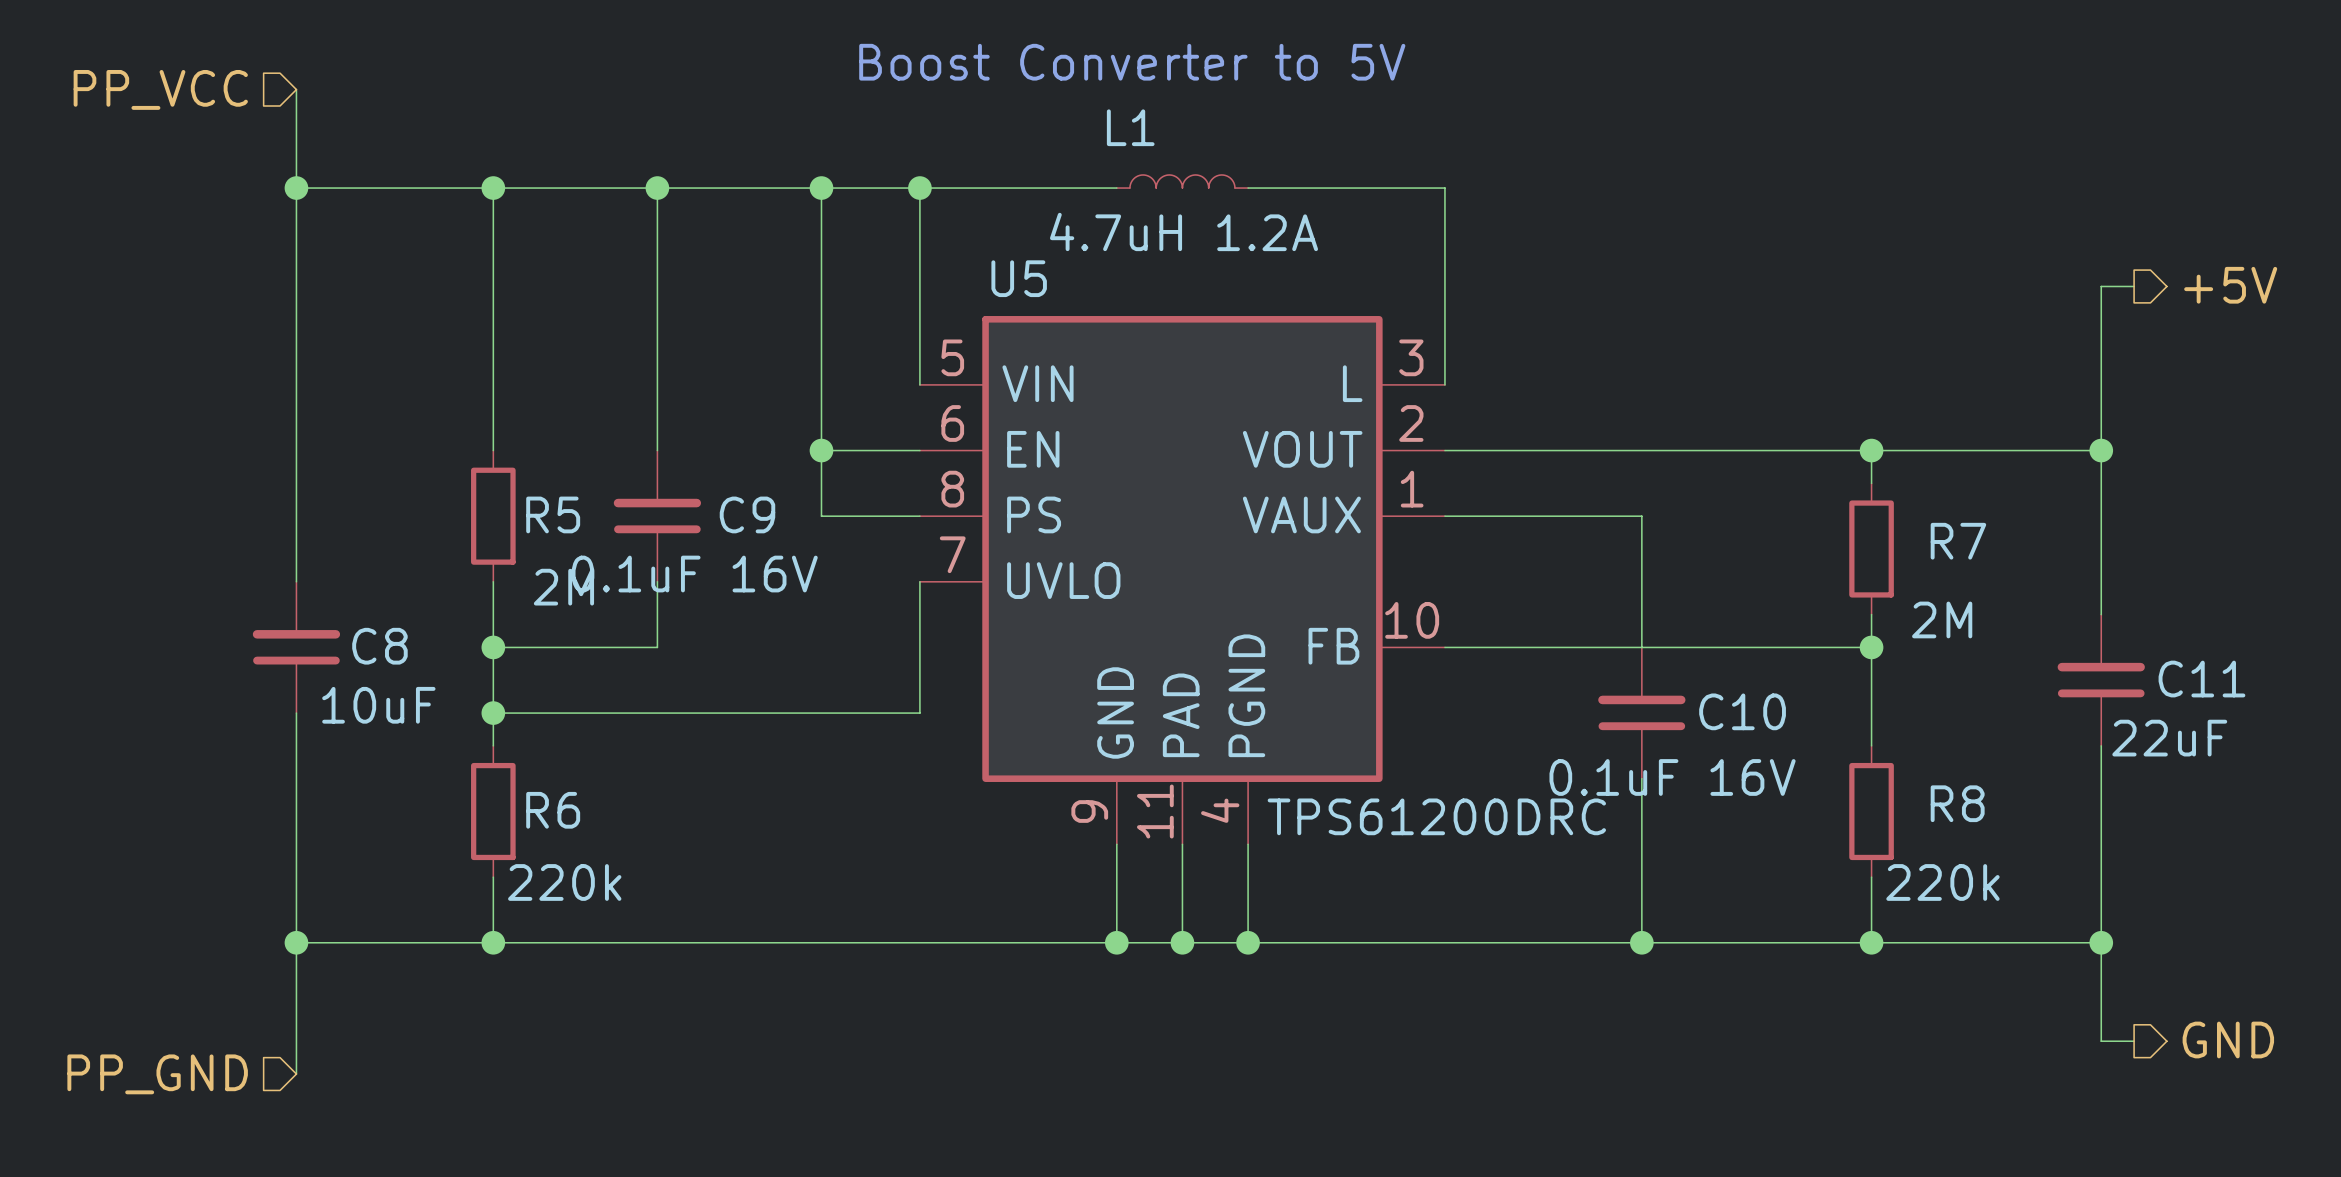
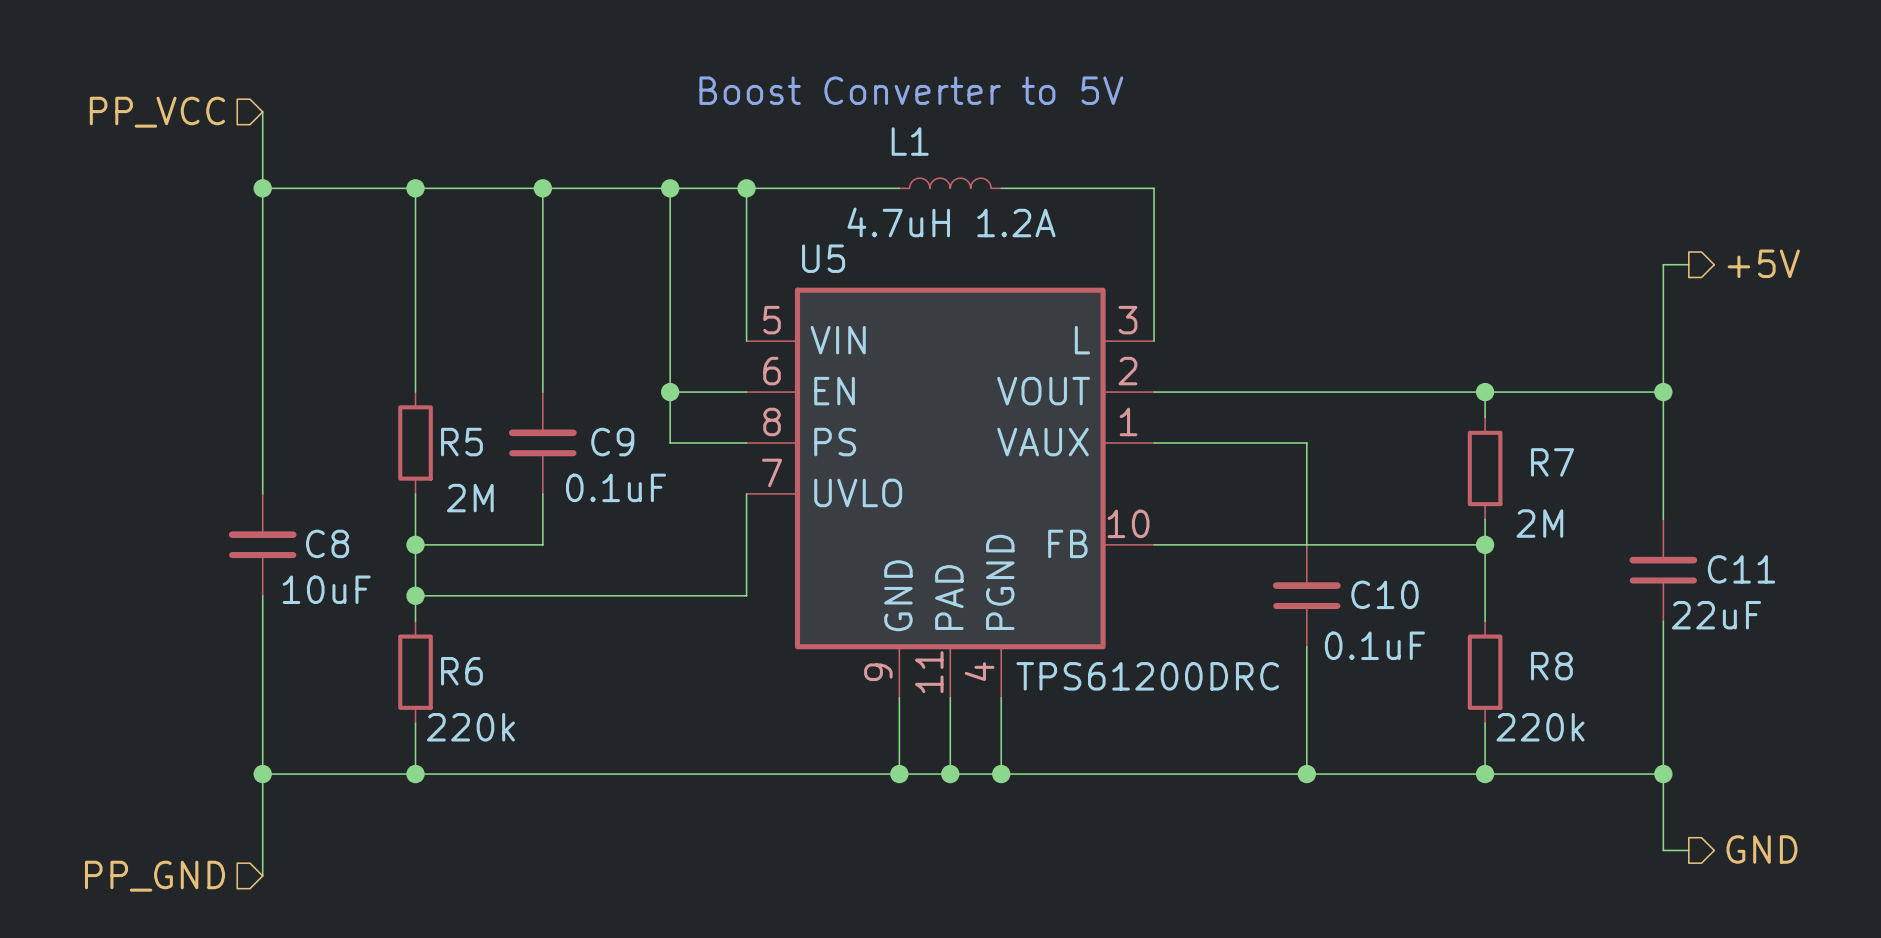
C9 value: 0.1uF 16V (694, 574) -> 0.1uF (616, 487)
C10 value: 0.1uF 16V (1672, 777) -> 0.1uF (1374, 645)

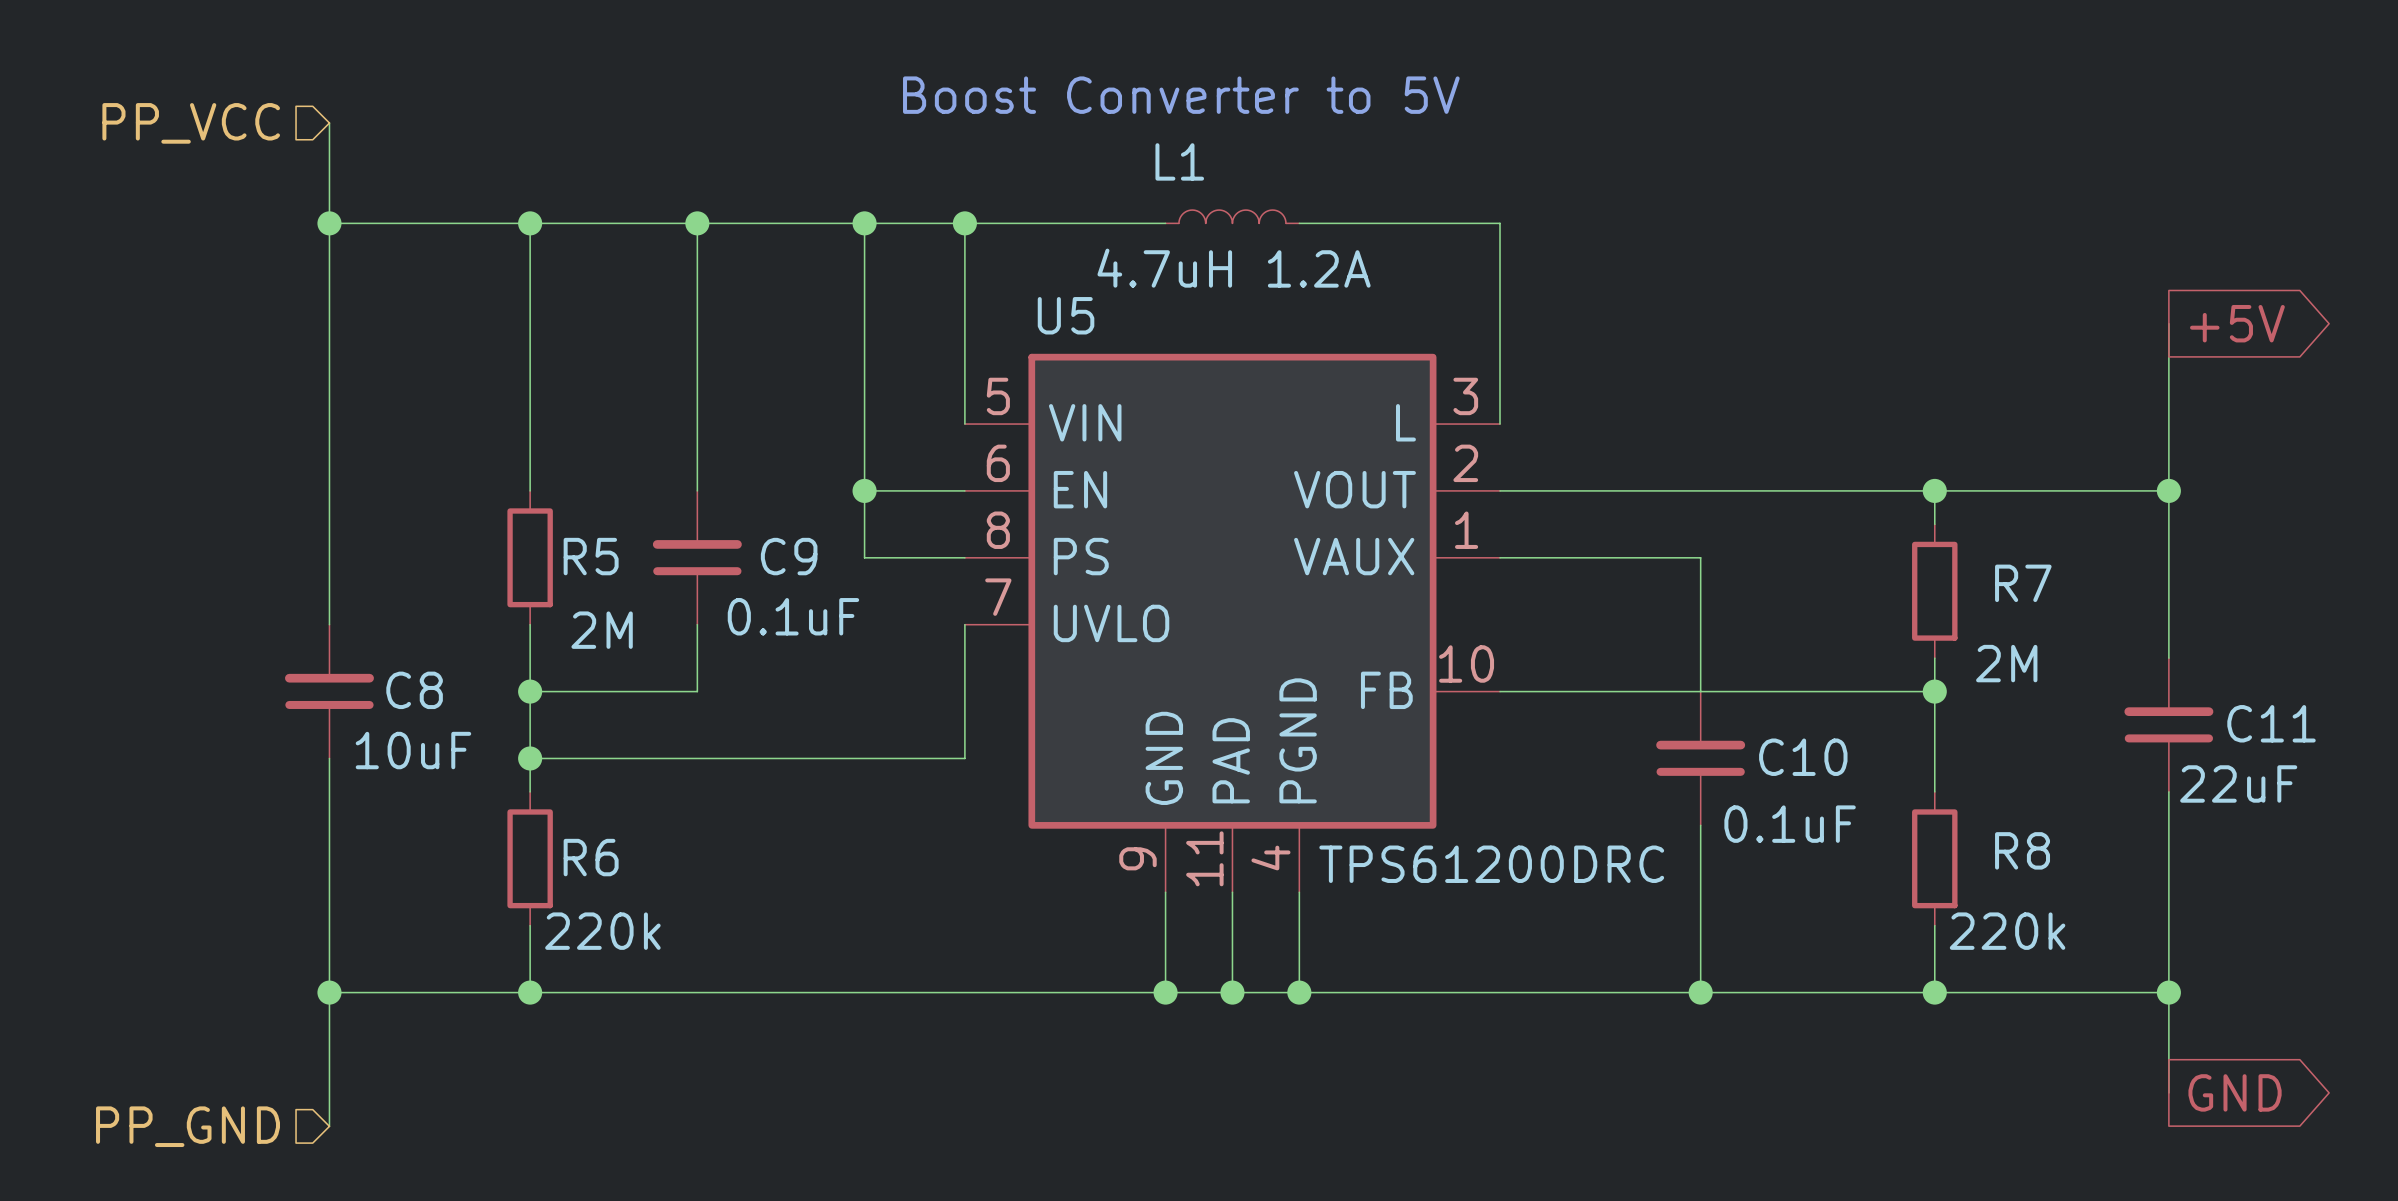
hierarchical label: +5V (1763, 263) -> none
wire: (1663, 264) (1688, 264) -> none
global label: none -> +5V (2237, 323)
hierarchical label: GND (1761, 849) -> none
wire: (1663, 850) (1688, 850) -> none
global label: none -> GND (2235, 1092)

